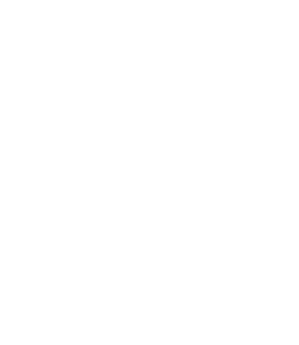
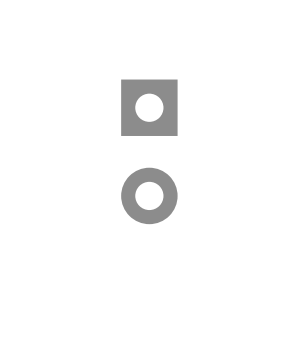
part: none -> (149, 151)

